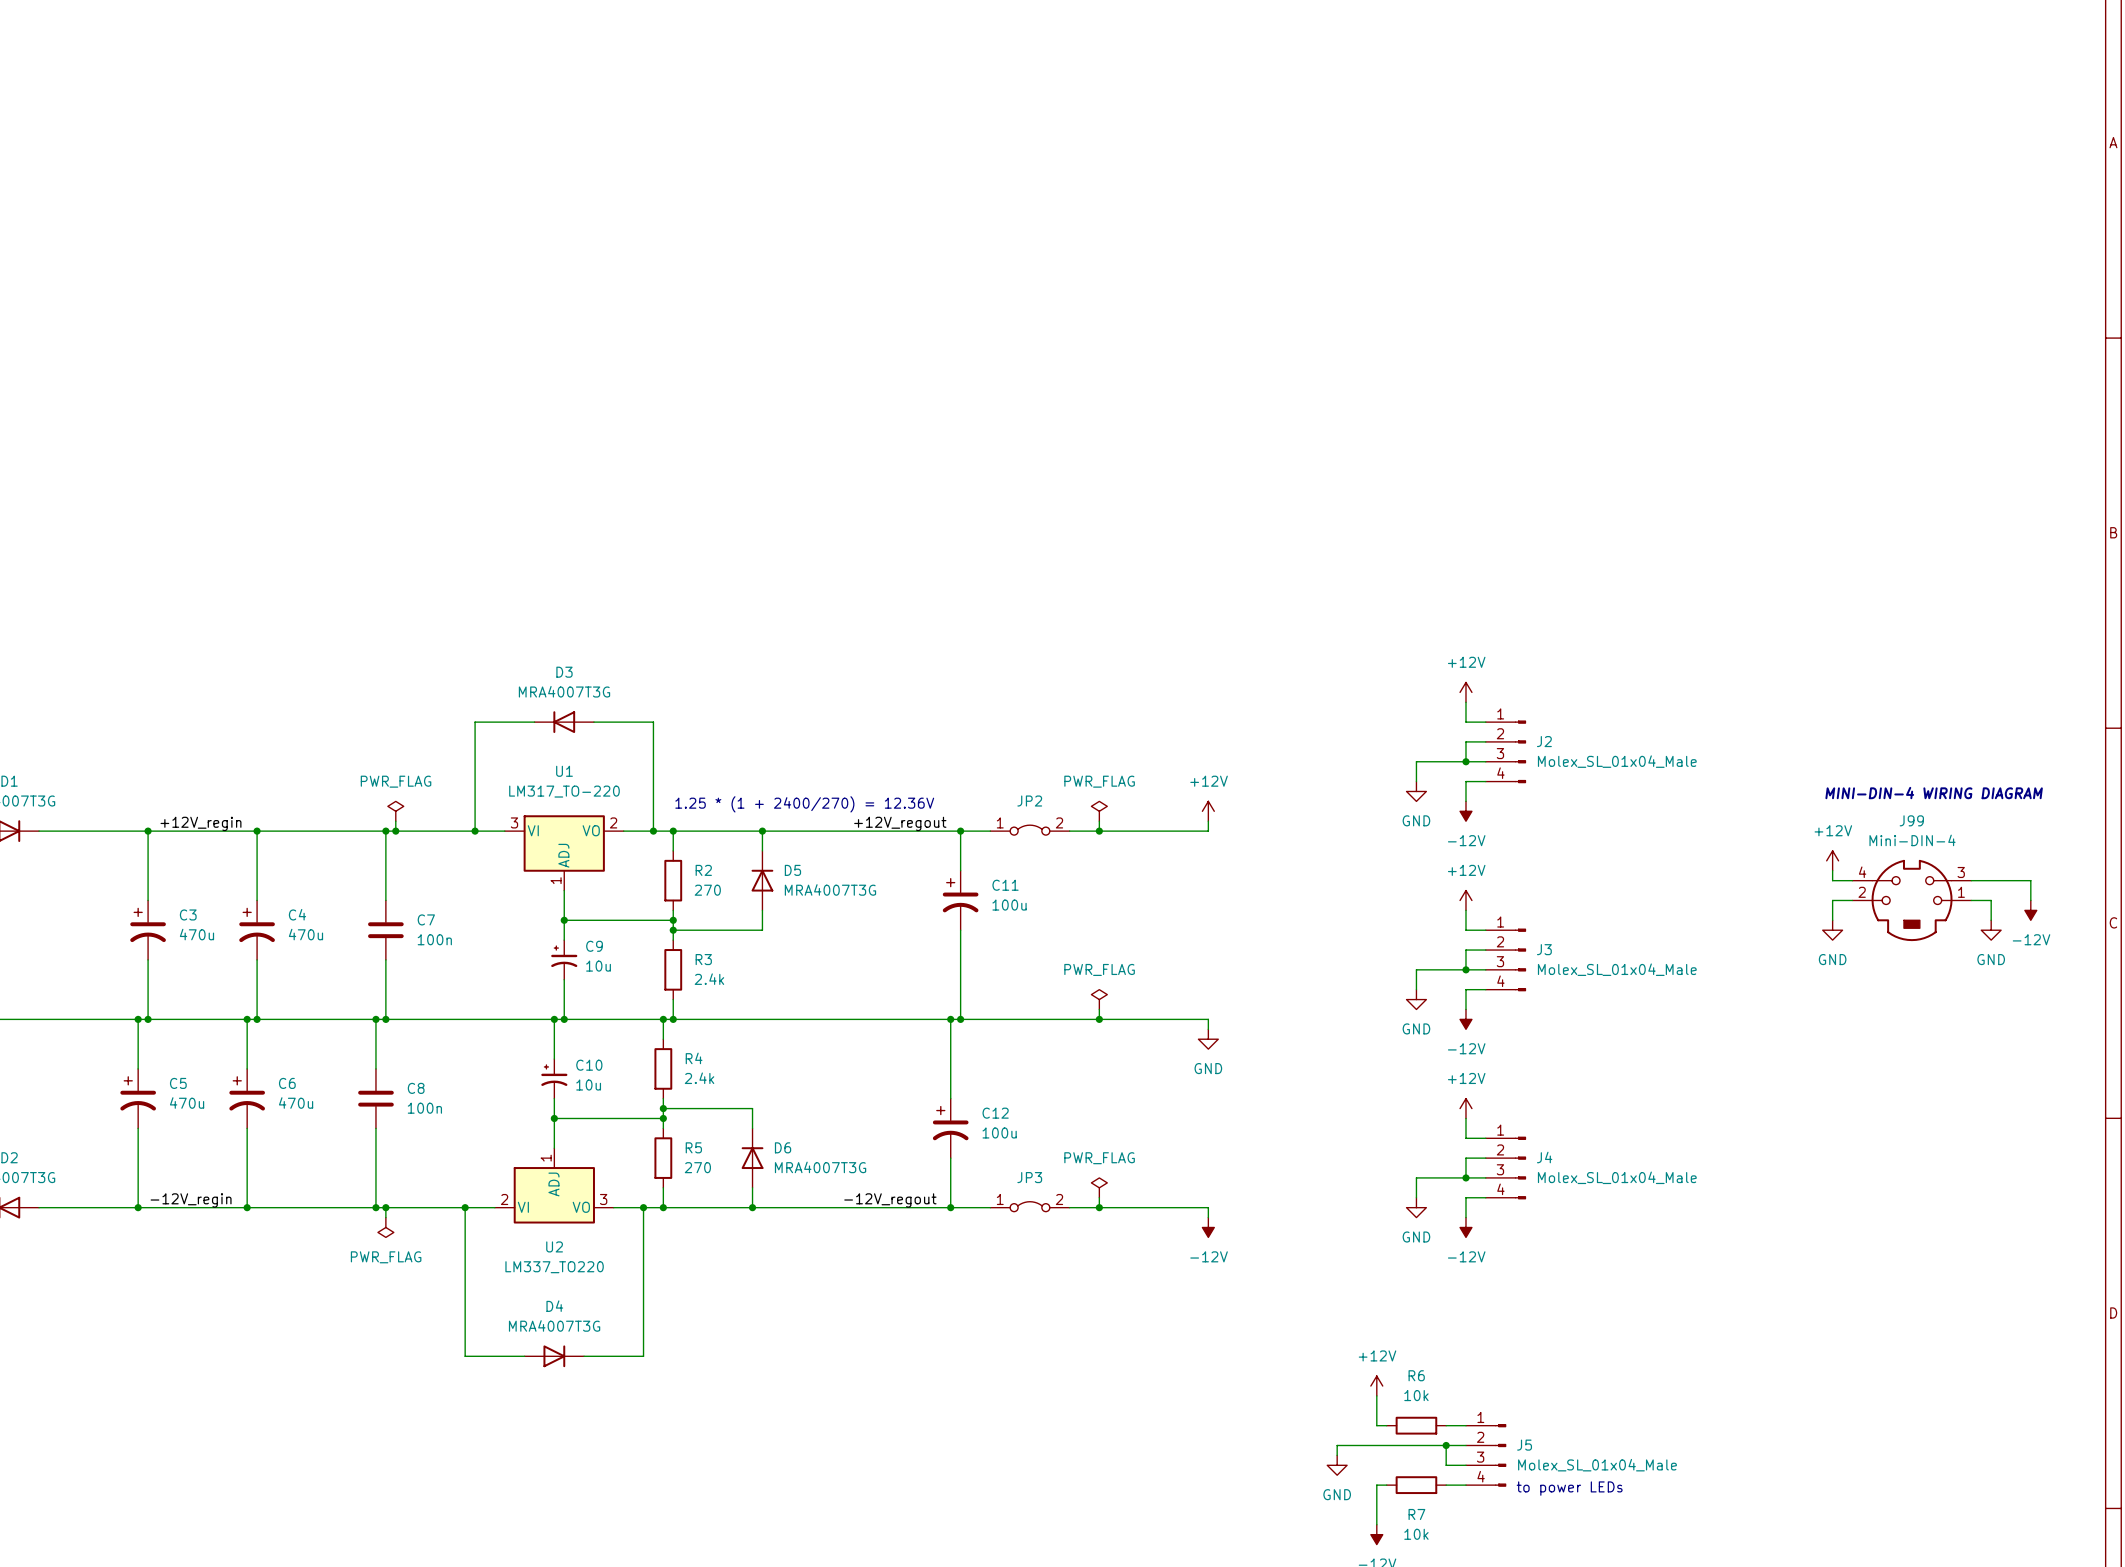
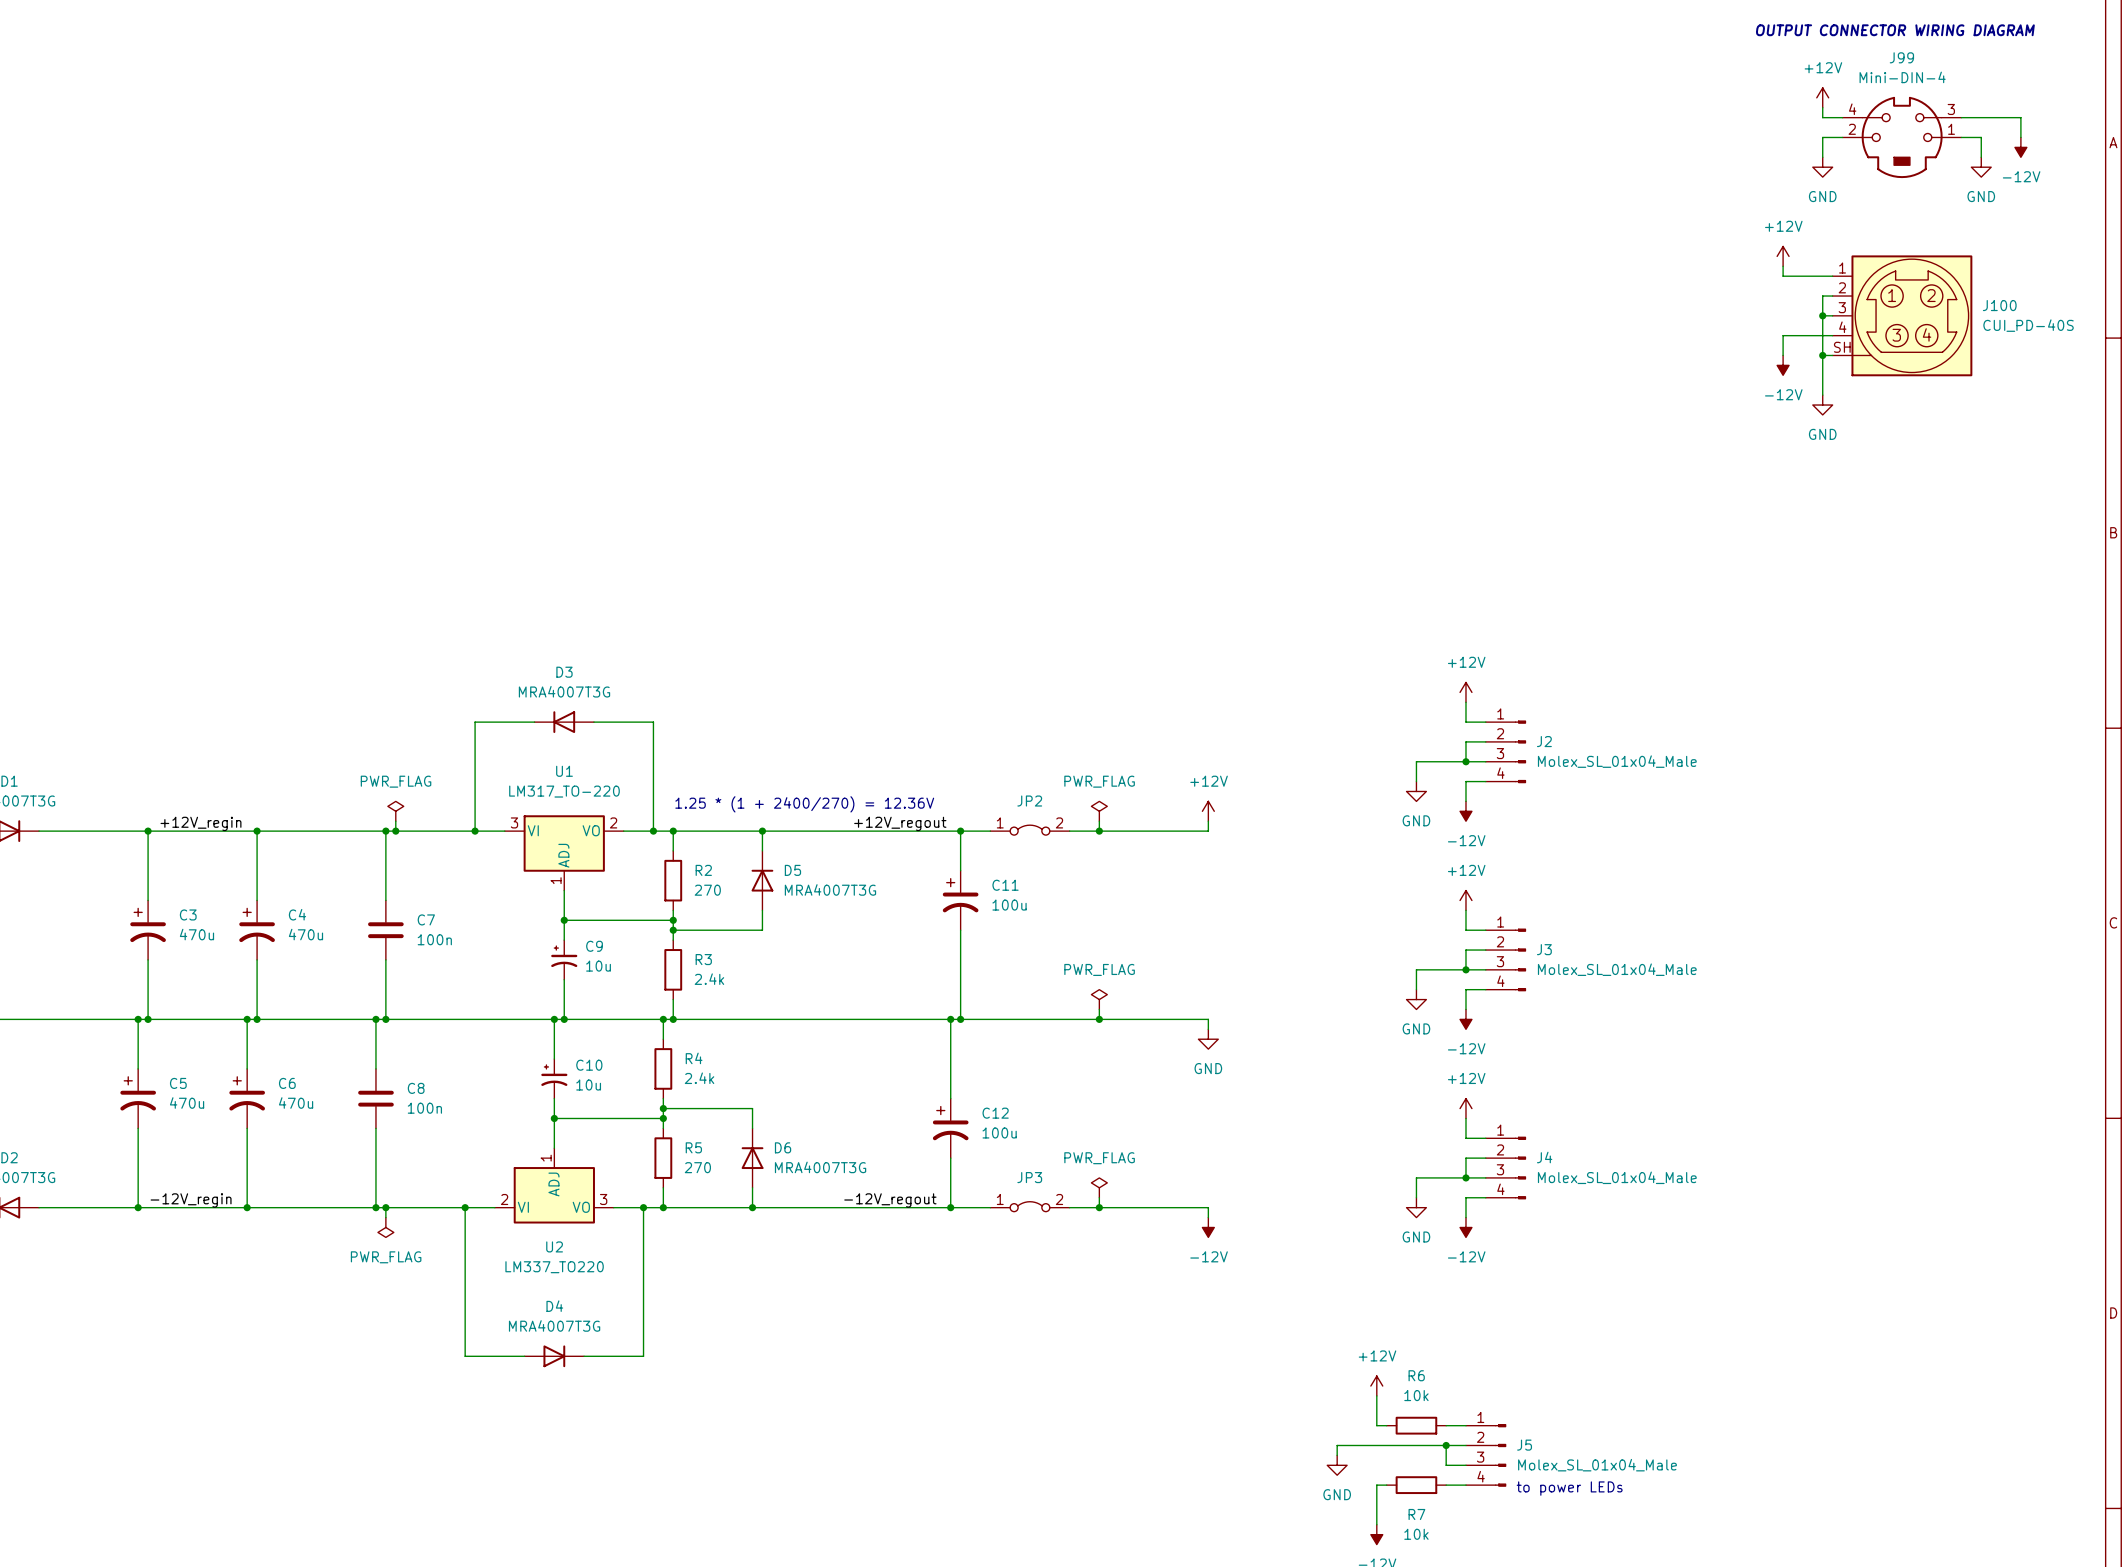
text: none -> OUTPUT CONNECTOR WIRING DIAGRAM (1895, 30)
power symbol: none -> +12V (1822, 97)
wire: none -> (1822, 107) (1822, 117) (1842, 117)
wire: none -> (1961, 117) (2020, 117) (2020, 137)
wire: none -> (1842, 137) (1822, 137) (1822, 157)
wire: none -> (1961, 137) (1981, 137) (1981, 157)
power symbol: none -> -12V (2020, 147)
power symbol: none -> GND (1822, 167)
power symbol: none -> GND (1981, 167)
power symbol: none -> +12V (1783, 256)
wire: none -> (1783, 266) (1783, 276) (1832, 276)
wire: none -> (1832, 296) (1822, 296) (1822, 395)
wire: none -> (1822, 315) (1832, 315)
junction: none -> (1822, 315)
J100: none -> CUI_PD-40S (1902, 315)
wire: none -> (1832, 335) (1783, 335) (1783, 355)
wire: none -> (1822, 355) (1832, 355)
junction: none -> (1822, 355)
power symbol: none -> -12V (1783, 365)
power symbol: none -> GND (1822, 405)
text: MINI-DIN-4 WIRING DIAGRAM (1934, 793) -> none
power symbol: +12V (1832, 860) -> none
wire: (1832, 870) (1832, 880) (1852, 880) -> none
wire: (1971, 880) (2030, 880) (2030, 900) -> none
wire: (1852, 900) (1832, 900) (1832, 920) -> none
J99 position: (1911, 900) -> (1902, 137)
wire: (1971, 900) (1991, 900) (1991, 920) -> none
power symbol: -12V (2030, 910) -> none
power symbol: GND (1832, 930) -> none
power symbol: GND (1991, 930) -> none

